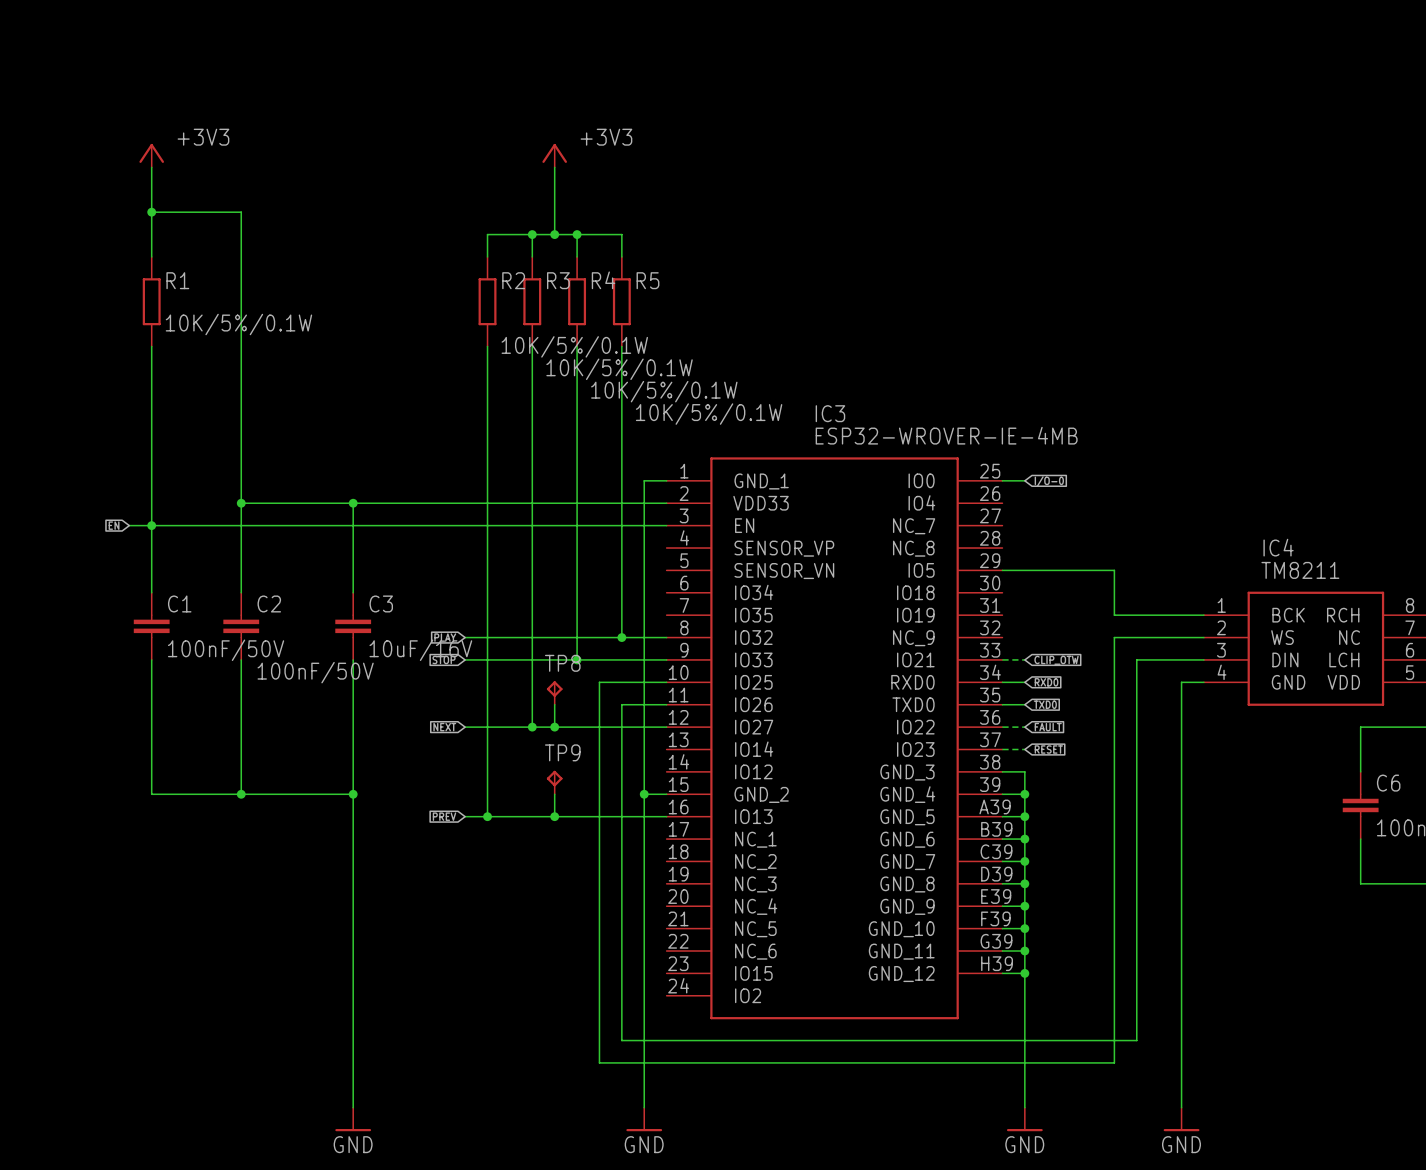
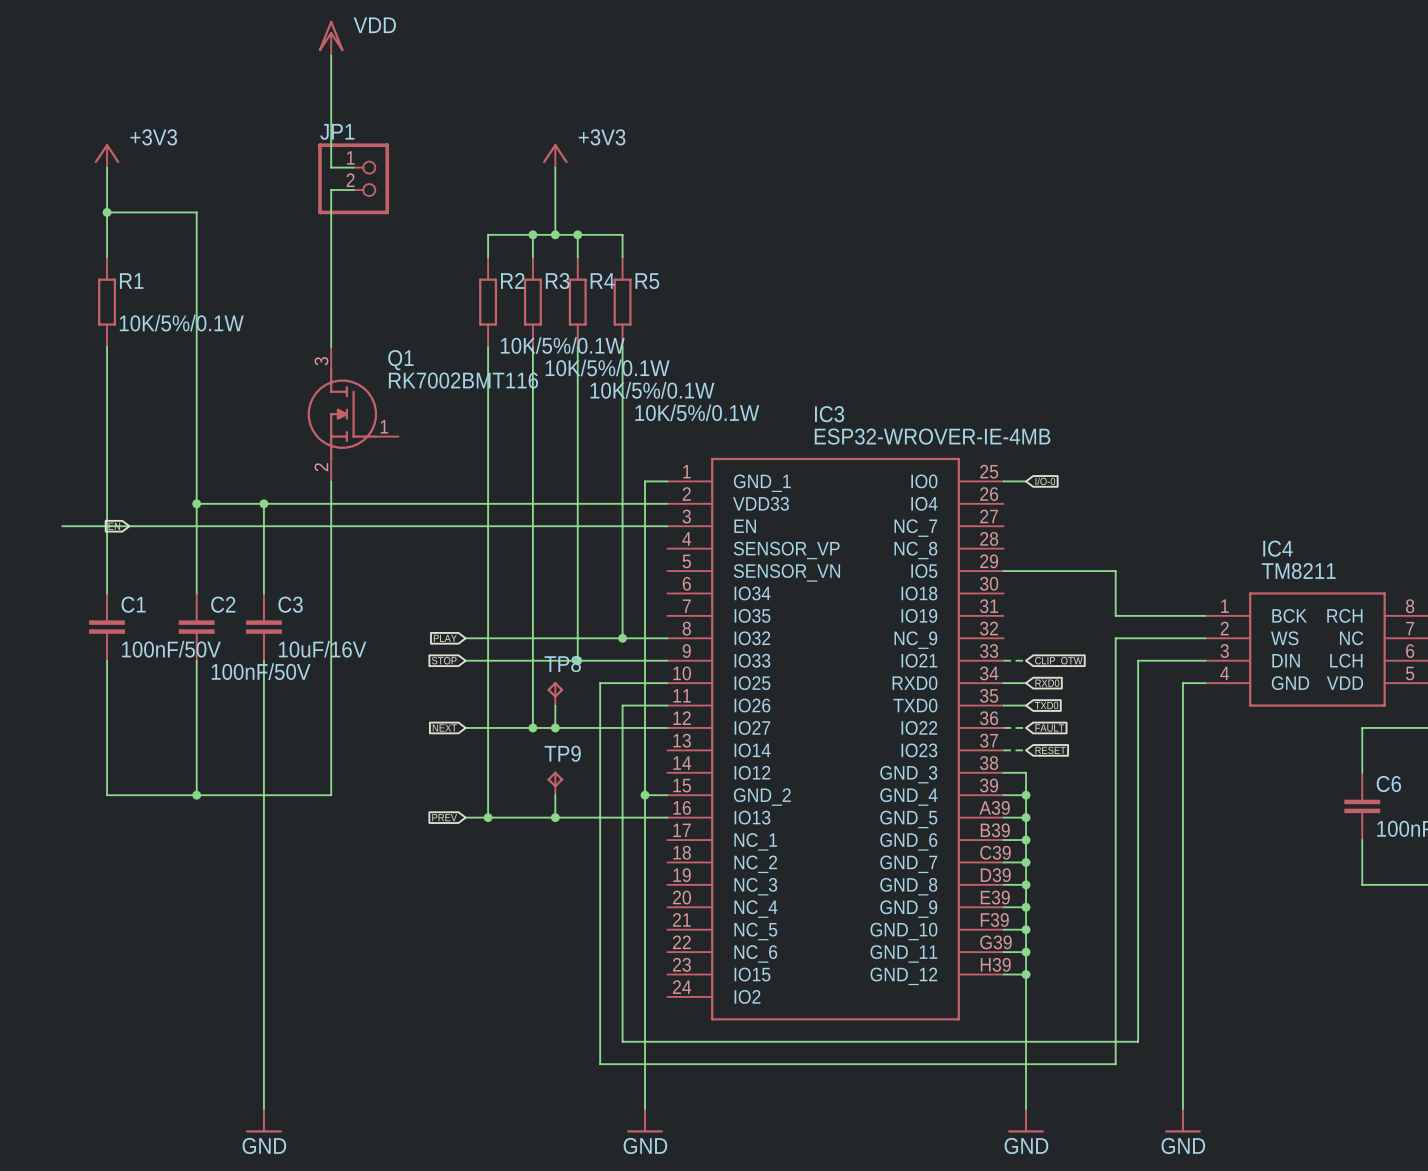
power symbol: none -> VDD (331, 38)
wire: none -> (331, 55) (331, 167) (353, 167)
power symbol position: +3V3 (151, 155) -> +3V3 (107, 155)
wire: (151, 167) (151, 256) -> (107, 167) (107, 257)
JP1: none -> (353, 178)
wire: none -> (353, 190) (331, 190) (331, 346)
wire: none -> (107, 212) (151, 212)
junction position: (151, 212) -> (107, 212)
wire: (196, 212) (241, 212) (241, 592) -> (196, 212) (196, 593)
R1 position: (151, 301) -> (107, 302)
wire: (151, 346) (151, 592) -> (107, 346) (107, 593)
Q1: none -> RK7002BMT116 (353, 414)
wire: none -> (196, 503) (241, 503)
junction: none -> (196, 503)
junction: (241, 503) -> none
junction: none -> (263, 503)
wire: (353, 503) (353, 592) -> (263, 503) (263, 593)
junction: (353, 503) -> none
wire: none -> (62, 526) (129, 526)
junction: (151, 525) -> none
C1 position: (151, 626) -> (107, 627)
C2 position: (241, 626) -> (196, 627)
C3 position: (353, 626) -> (263, 627)
wire: (151, 659) (151, 794) -> (107, 660) (107, 795) (151, 795)
wire: (241, 659) (241, 794) -> (196, 660) (196, 795)
wire: (353, 659) (353, 1107) -> (263, 660) (263, 1109)
junction position: (241, 794) -> (196, 795)
wire: (330, 794) (353, 794) -> (331, 795) (331, 481)
junction: (353, 794) -> none
power symbol position: GND (353, 1119) -> GND (263, 1120)

